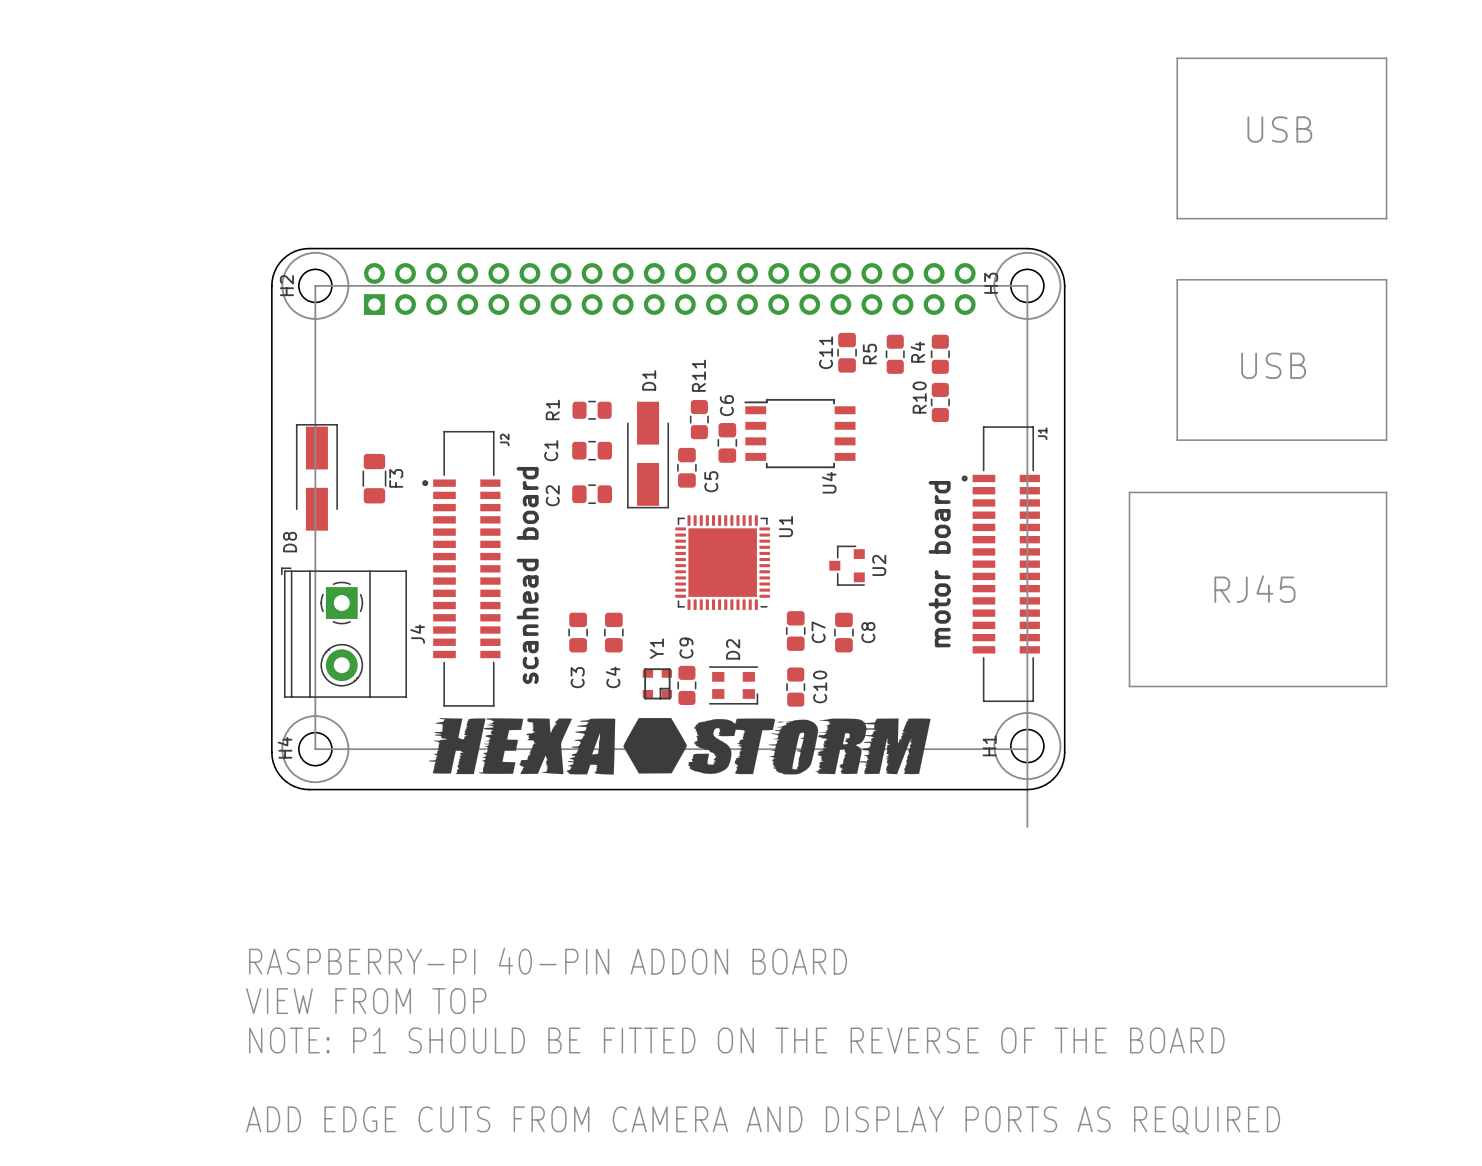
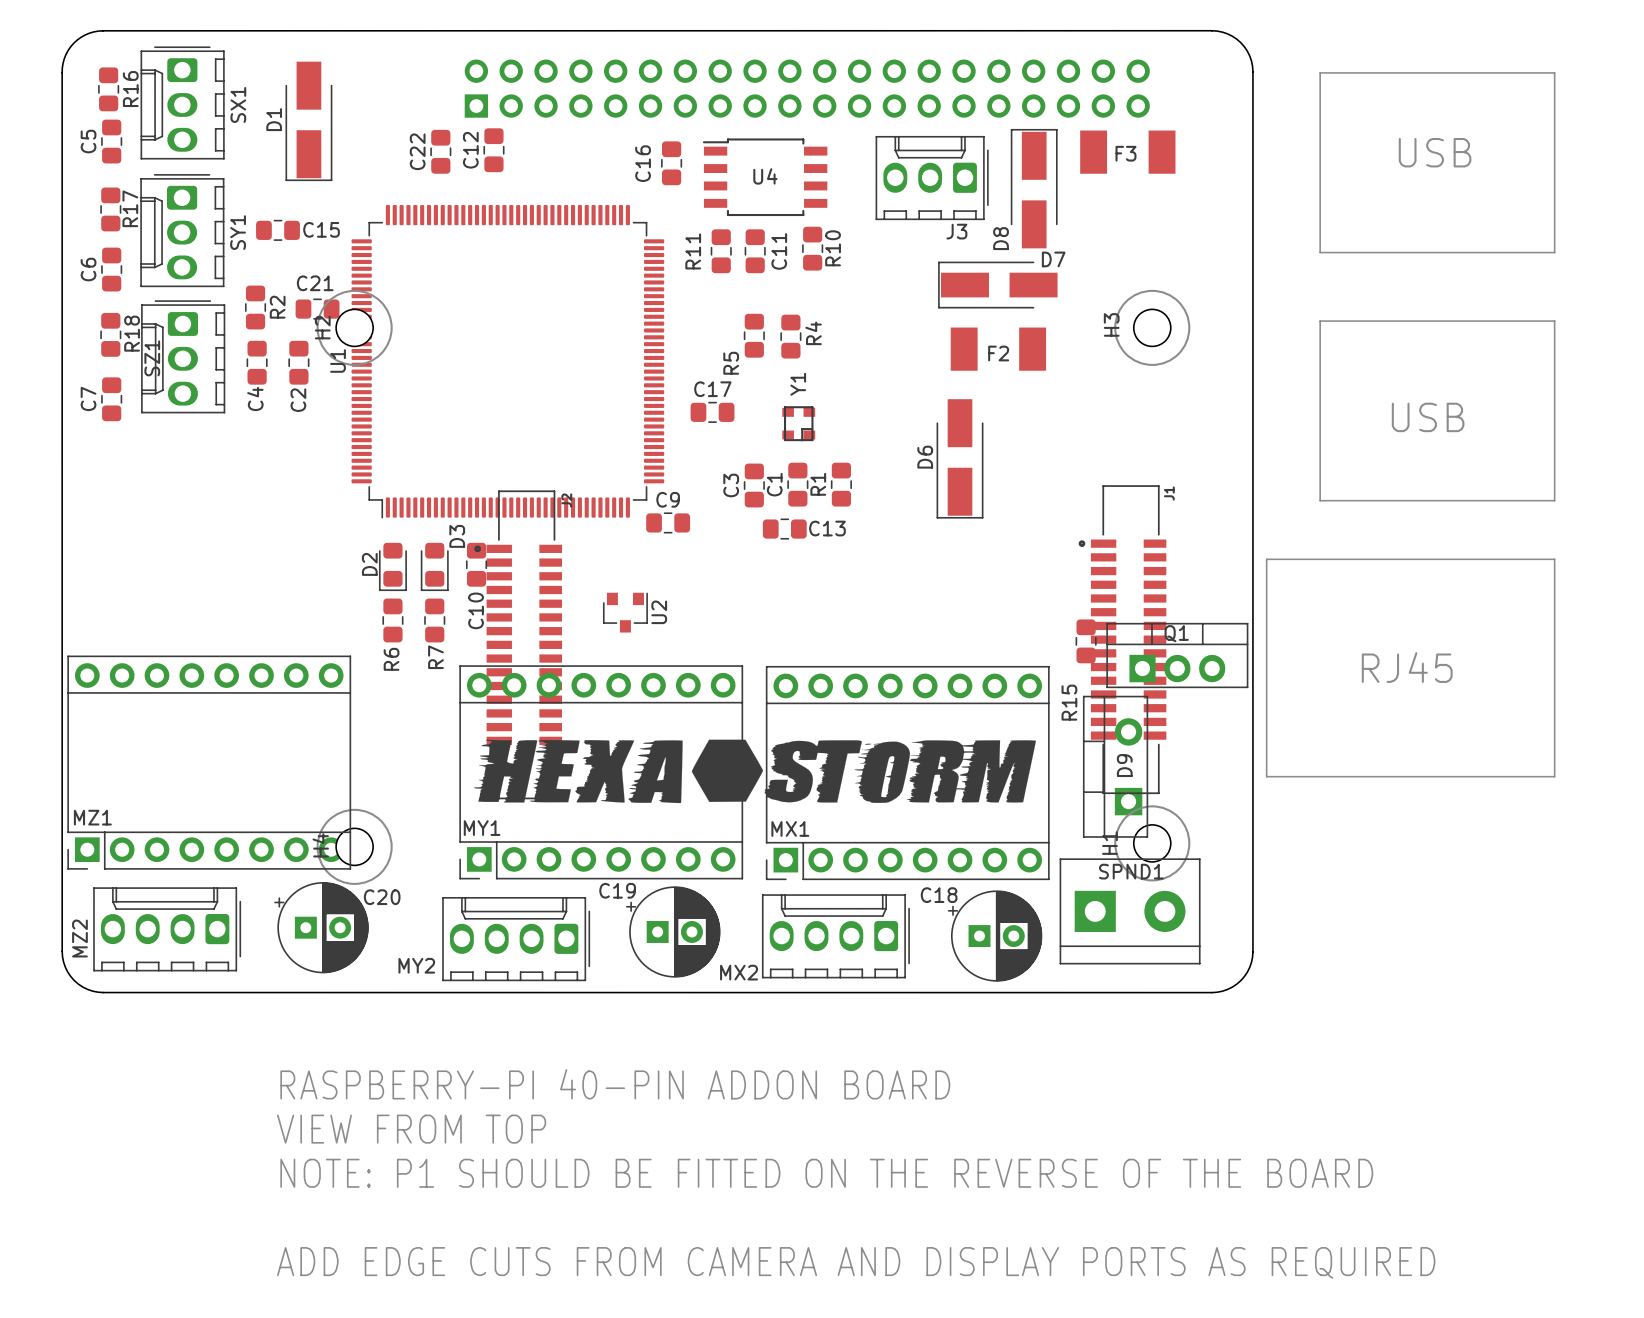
R16: none -> (108, 89)
SX1: none -> (182, 102)
C12: none -> (493, 150)
C22: none -> (440, 151)
C16: none -> (671, 163)
J3: none -> (932, 178)
R17: none -> (110, 209)
C15: none -> (278, 230)
SY1: none -> (182, 230)
D7: none -> (997, 285)
board edge: (309, 248) (1027, 248) (1041, 251) (1050, 256) (1061, 271) (1064, 285) (1064, 752) (1061, 766) (1056, 774) (1041, 786) (1027, 789) (309, 789) (299, 788) (286, 781) (274, 766) (271, 752) (271, 285) (274, 271) (282, 259) (294, 251) (309, 248) -> none
R2: none -> (255, 307)
C21: none -> (317, 309)
part position: (669, 288) -> (807, 88)
R18: none -> (110, 334)
F2: none -> (998, 349)
SZ1: none -> (183, 356)
C11 footprint: [837, 332, 857, 373] -> [744, 229, 766, 274]
C11 name position: C11 (826, 352) -> C11 (779, 251)
R4 name position: R4 (917, 352) -> R4 (813, 333)
R5 name position: R5 (869, 353) -> R5 (731, 363)
R5 position: (895, 354) -> (754, 335)
R4 position: (940, 354) -> (790, 336)
C17: none -> (712, 412)
R11 name position: R11 (698, 375) -> R11 (693, 251)
D1 name position: D1 (649, 380) -> D1 (274, 119)
R10 name position: R10 (919, 397) -> R10 (833, 248)
D6: none -> (960, 458)
R10 position: (940, 402) -> (812, 248)
C6 name position: C6 (726, 405) -> C6 (88, 269)
R1 rotation: 0° (592, 410) -> 90° clockwise (841, 484)
R1 position: (592, 410) -> (841, 484)
R11 position: (699, 419) -> (721, 251)
C6 footprint: [717, 423, 738, 463] -> [101, 247, 123, 292]
U4 position: (799, 433) -> (765, 177)
C1 footprint: [572, 440, 612, 461] -> [787, 462, 809, 507]
C5 footprint: [677, 447, 697, 488] -> [101, 119, 123, 164]
F3 footprint: [362, 453, 387, 504] -> [1080, 130, 1176, 174]
D1 position: (648, 455) -> (308, 121)
C13: none -> (784, 529)
D8 position: (316, 477) -> (1034, 188)
F3 name position: F3 (396, 478) -> F3 (1125, 153)
C5 name position: C5 (711, 481) -> C5 (88, 141)
U4 name rotation: 0° (829, 482) -> 90° clockwise (765, 176)
U4 name position: U4 (829, 482) -> U4 (765, 176)
C2 footprint: [572, 484, 612, 504] -> [288, 340, 310, 385]
C2 name position: C2 (552, 495) -> C2 (298, 400)
D3: none -> (434, 566)
U1 footprint: [675, 515, 771, 611] -> [351, 204, 665, 519]
U1 name position: U1 (785, 526) -> U1 (338, 361)
D8 name position: D8 (290, 542) -> D8 (1001, 238)
R6: none -> (392, 620)
R7: none -> (434, 620)
text: motor board (939, 564) -> none
U2 rotation: 0° (847, 565) -> 90° counterclockwise (625, 612)
U2 position: (847, 565) -> (625, 612)
R15: none -> (1086, 641)
text: scanhead board (527, 575) -> none
Q1: none -> (1177, 655)
C7 footprint: [786, 611, 806, 651] -> [101, 377, 123, 422]
C3 footprint: [568, 612, 588, 653] -> [743, 463, 765, 508]
C4 footprint: [604, 612, 624, 653] -> [246, 340, 268, 385]
J4: (344, 632) -> none
C7 name position: C7 (818, 632) -> C7 (88, 398)
C8: (843, 632) -> none
D2 name position: D2 (733, 649) -> D2 (369, 564)
D2 footprint: [708, 666, 759, 705] -> [378, 542, 407, 592]
MZ1: none -> (209, 762)
C3 name position: C3 (577, 677) -> C3 (731, 485)
D9: none -> (1115, 766)
MY1: none -> (601, 772)
Y1 position: (657, 683) -> (798, 423)
MX1: none -> (907, 773)
C9 rotation: 0° (686, 685) -> 90° clockwise (668, 522)
C9 position: (686, 685) -> (668, 522)
C10 name position: C10 (820, 686) -> C10 (476, 610)
C10 position: (795, 687) -> (476, 564)
drawing position: (679, 746) -> (754, 771)
line: (1027, 749) (315, 749) (315, 285) (1027, 285) (1027, 826) -> none
SPND1: none -> (1130, 911)
C20: none -> (321, 927)
MZ2: none -> (167, 929)
C19: none -> (673, 931)
C18: none -> (995, 936)
MX2: none -> (835, 936)
MY2: none -> (516, 939)
board edge: none -> (62, 951) (62, 72) (65, 54) (77, 40) (89, 33) (102, 30) (1211, 30) (1227, 33) (1244, 46) (1251, 61) (1252, 71) (1252, 951) (1249, 967) (1236, 984) (1227, 989) (1211, 992) (103, 992) (87, 989) (74, 980) (65, 967) (62, 951)

